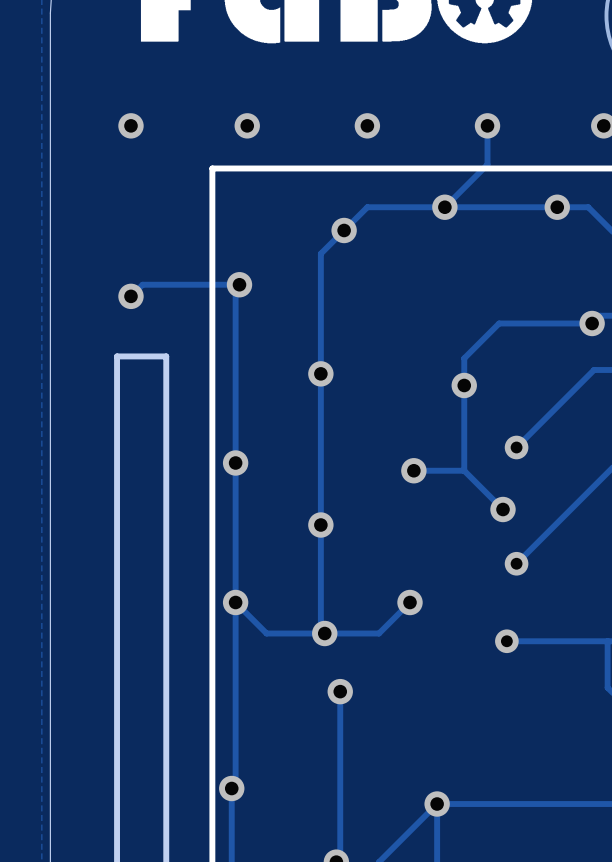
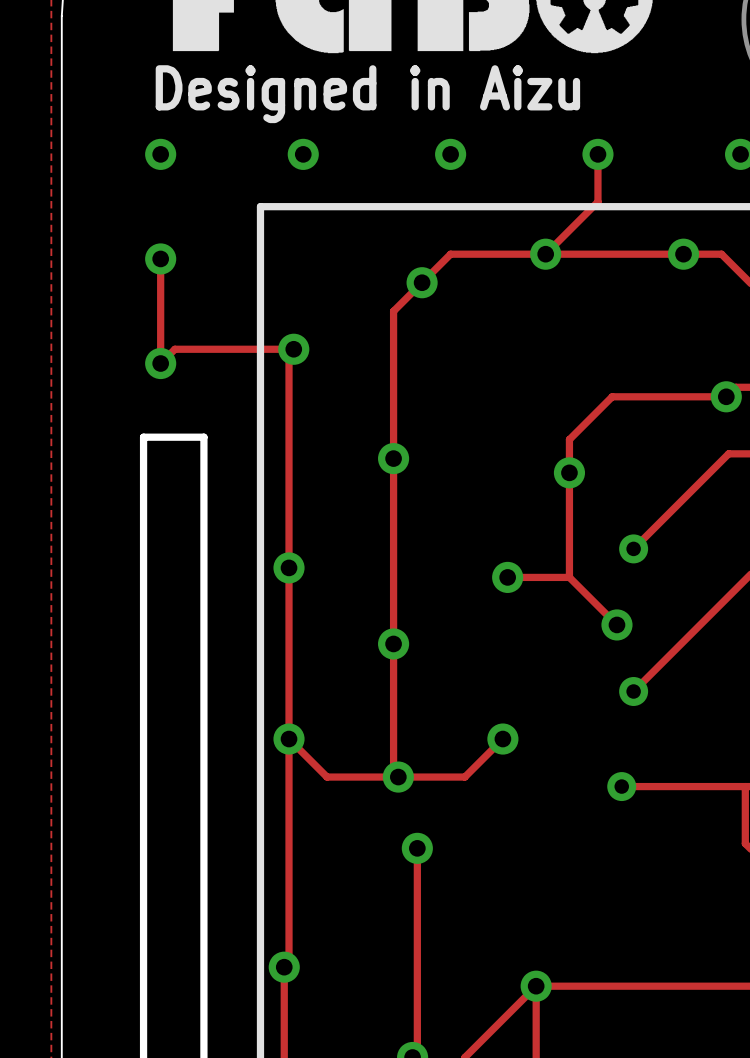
text: none -> Designed in Aizu (367, 94)
track: none -> (160, 258) (160, 363)
via: none -> (160, 258)

